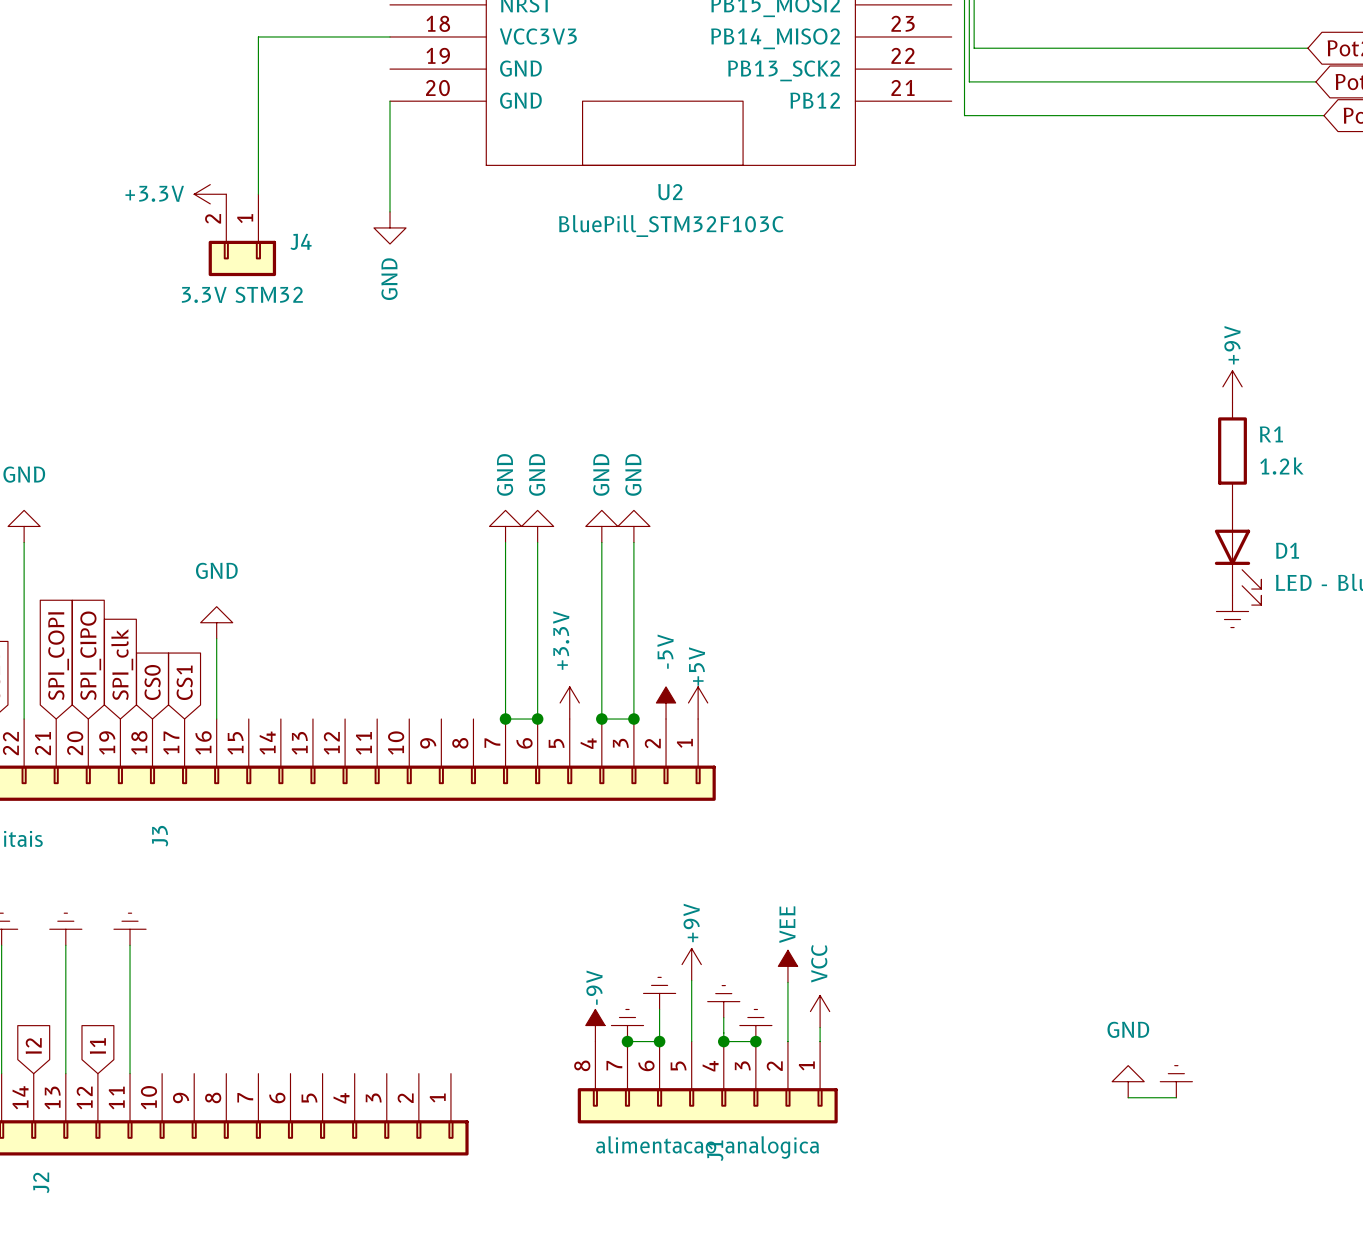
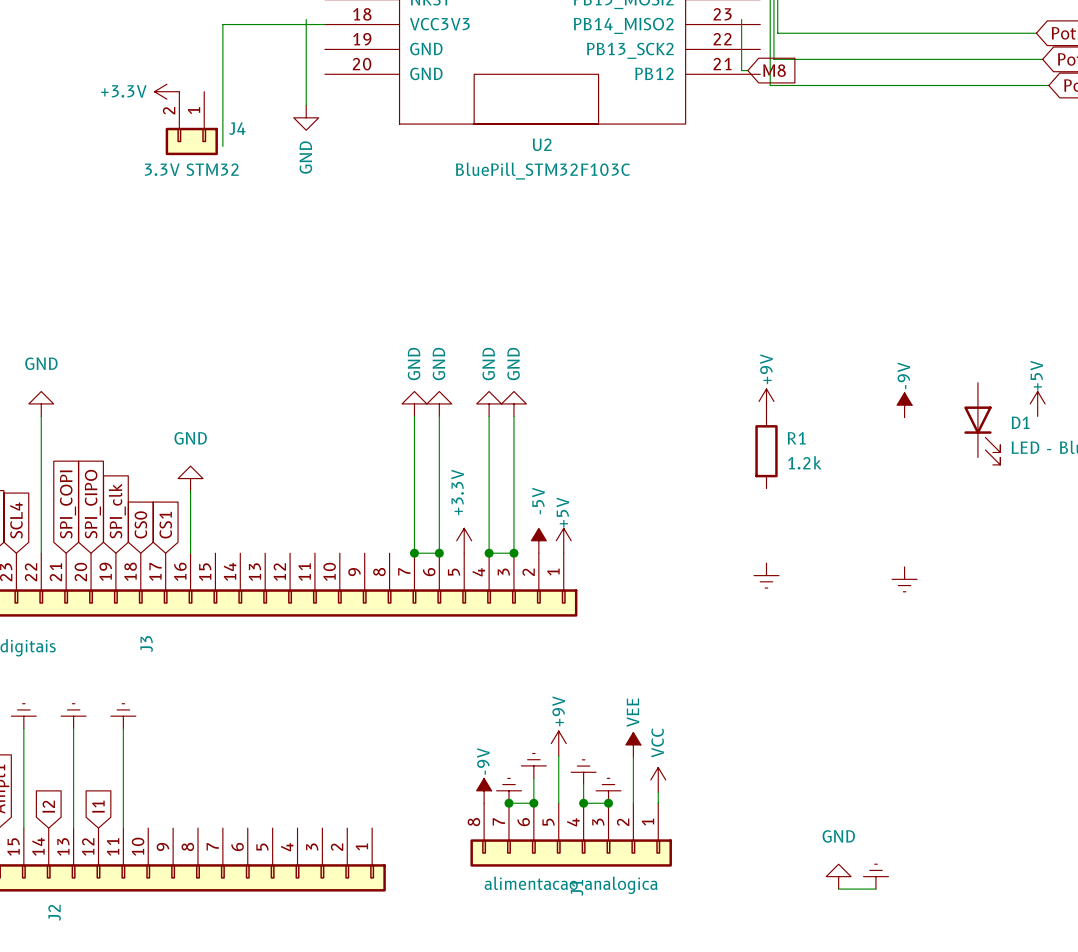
wire: none -> (741, 19) (741, 70) (747, 70)
global label: none -> M8 (774, 70)
wire: (390, 101) (390, 211) -> (306, 19) (306, 105)
power symbol position: +3.3V (210, 194) -> +3.3V (166, 91)
power symbol position: GND (390, 227) -> GND (306, 117)
J4 position: (242, 235) -> (191, 123)
power symbol position: +9V (1232, 386) -> +9V (766, 401)
R1 position: (1232, 451) -> (766, 451)
power symbol: none -> +5V (1037, 403)
power symbol: none -> -9V (904, 405)
power symbol: (1232, 611) -> none
power symbol: none -> (766, 575)
power symbol: none -> (904, 579)
power symbol position: GND (1128, 1081) -> GND (838, 876)
power symbol position: (1176, 1081) -> (875, 876)
wire: (1128, 1097) (1176, 1097) -> (838, 889) (875, 889)

